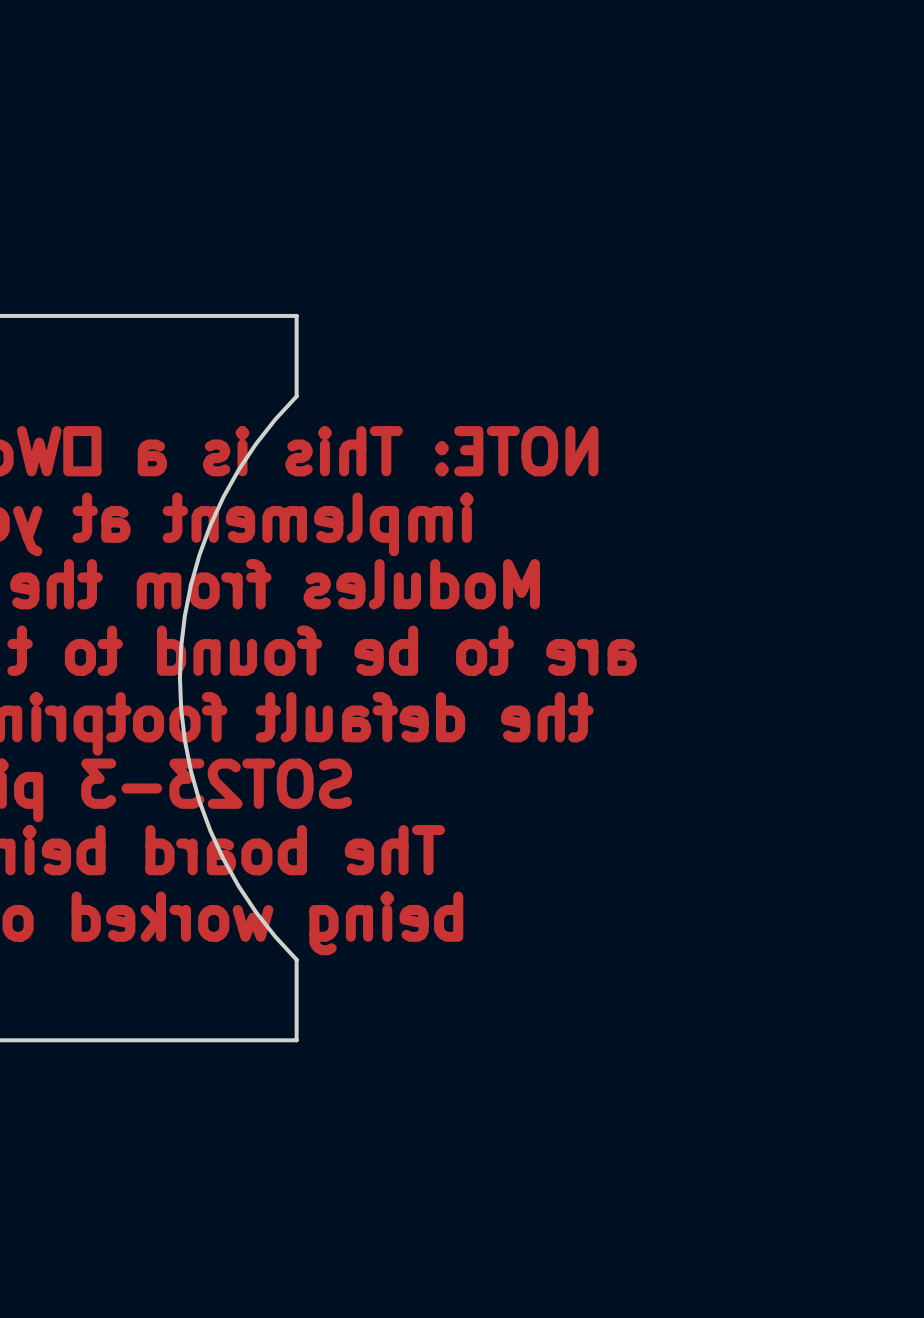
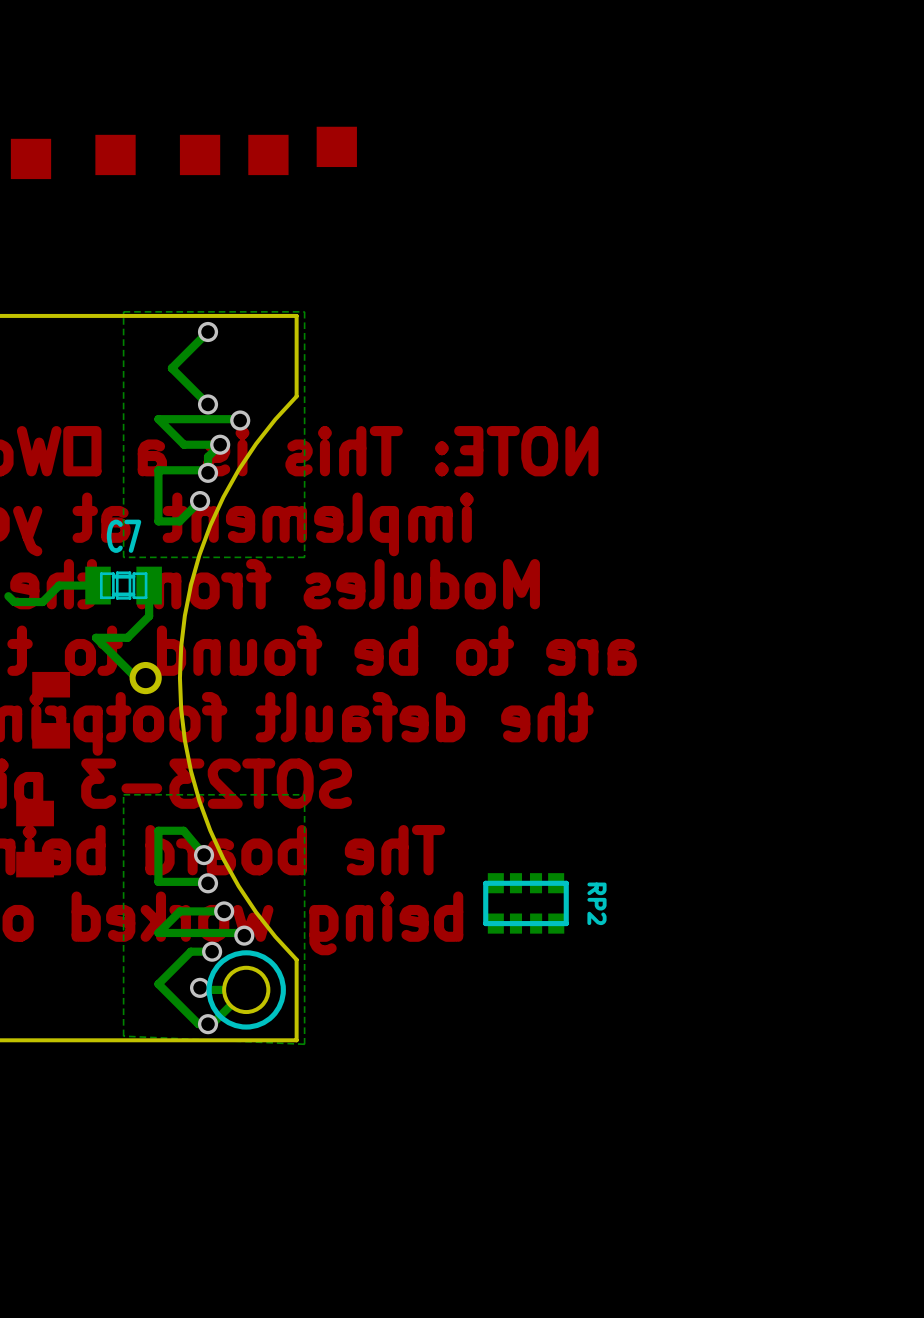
part: none -> (336, 146)
part: none -> (115, 154)
part: none -> (200, 154)
part: none -> (268, 154)
part: none -> (30, 158)
bottom zone outline: none -> (304, 311) (123, 311) (123, 557) (304, 557) (304, 311)
bottom track: none -> (208, 331) (171, 368) (208, 404)
via: none -> (208, 331)
via: none -> (208, 404)
bottom track: none -> (240, 420) (158, 419) (184, 444) (220, 444) (208, 456) (208, 472) (205, 470) (158, 470) (158, 521) (179, 521) (200, 501)
via: none -> (240, 420)
via: none -> (220, 444)
via: none -> (208, 472)
via: none -> (200, 501)
bottom track: none -> (98, 585) (59, 585) (42, 602) (14, 602) (8, 596)
C7: none -> (123, 585)
bottom track: none -> (149, 585) (149, 616) (127, 637) (96, 637) (136, 678) (145, 678)
part: none -> (145, 678)
part: none -> (51, 710)
bottom zone outline: none -> (304, 794) (304, 1044) (123, 1036) (123, 794) (304, 794)
part: none -> (35, 839)
bottom track: none -> (204, 855) (183, 830) (158, 830) (158, 881) (208, 883)
via: none -> (204, 855)
via: none -> (208, 883)
RP2: none -> (525, 903)
bottom track: none -> (224, 911) (180, 911) (158, 932) (241, 932) (244, 935)
via: none -> (224, 911)
via: none -> (244, 935)
bottom track: none -> (212, 951) (190, 951) (158, 984) (198, 1024) (212, 1024) (246, 989) (202, 989) (200, 987)
via: none -> (212, 951)
via: none -> (200, 987)
part: none -> (246, 989)
via: none -> (208, 1024)

